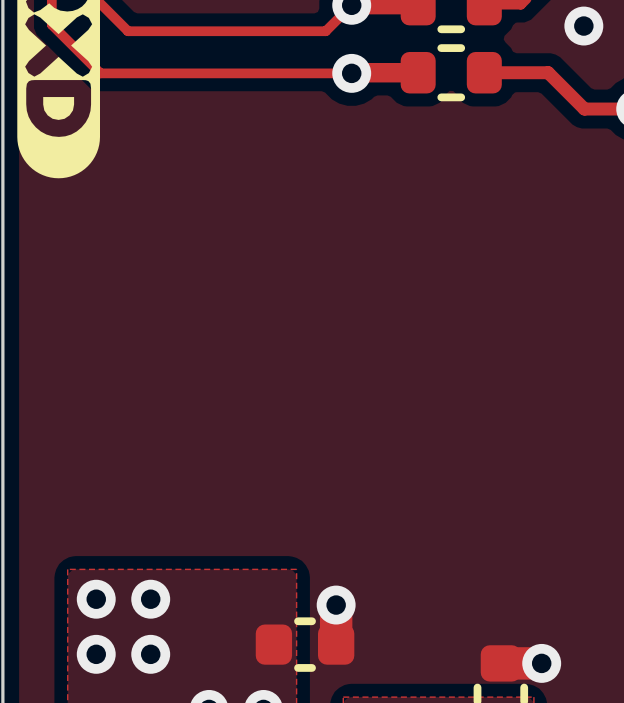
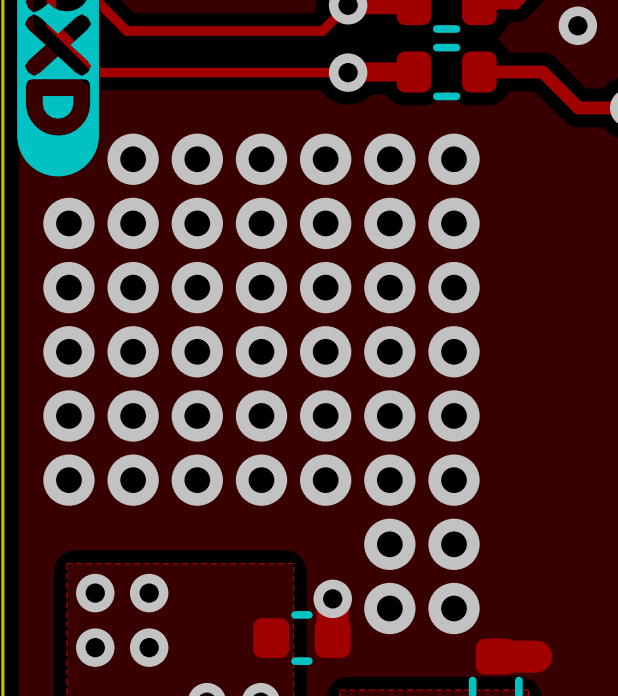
via: none -> (133, 159)
via: none -> (197, 159)
via: none -> (261, 159)
via: none -> (325, 159)
via: none -> (389, 159)
via: none -> (454, 159)
via: none -> (68, 223)
via: none -> (133, 223)
via: none -> (197, 223)
via: none -> (261, 223)
via: none -> (325, 223)
via: none -> (389, 223)
via: none -> (454, 223)
via: none -> (68, 287)
via: none -> (133, 287)
via: none -> (197, 287)
via: none -> (261, 287)
via: none -> (325, 287)
via: none -> (389, 287)
via: none -> (454, 287)
via: none -> (68, 351)
via: none -> (133, 351)
via: none -> (197, 351)
via: none -> (261, 351)
via: none -> (325, 351)
via: none -> (389, 351)
via: none -> (454, 351)
via: none -> (68, 415)
via: none -> (133, 415)
via: none -> (197, 415)
via: none -> (261, 415)
via: none -> (325, 415)
via: none -> (389, 415)
via: none -> (454, 415)
via: none -> (68, 480)
via: none -> (133, 480)
via: none -> (197, 480)
via: none -> (261, 480)
via: none -> (325, 480)
via: none -> (389, 480)
via: none -> (454, 480)
via: none -> (389, 544)
via: none -> (454, 544)
via: none -> (389, 608)
via: none -> (454, 608)
via: (541, 663) -> none

